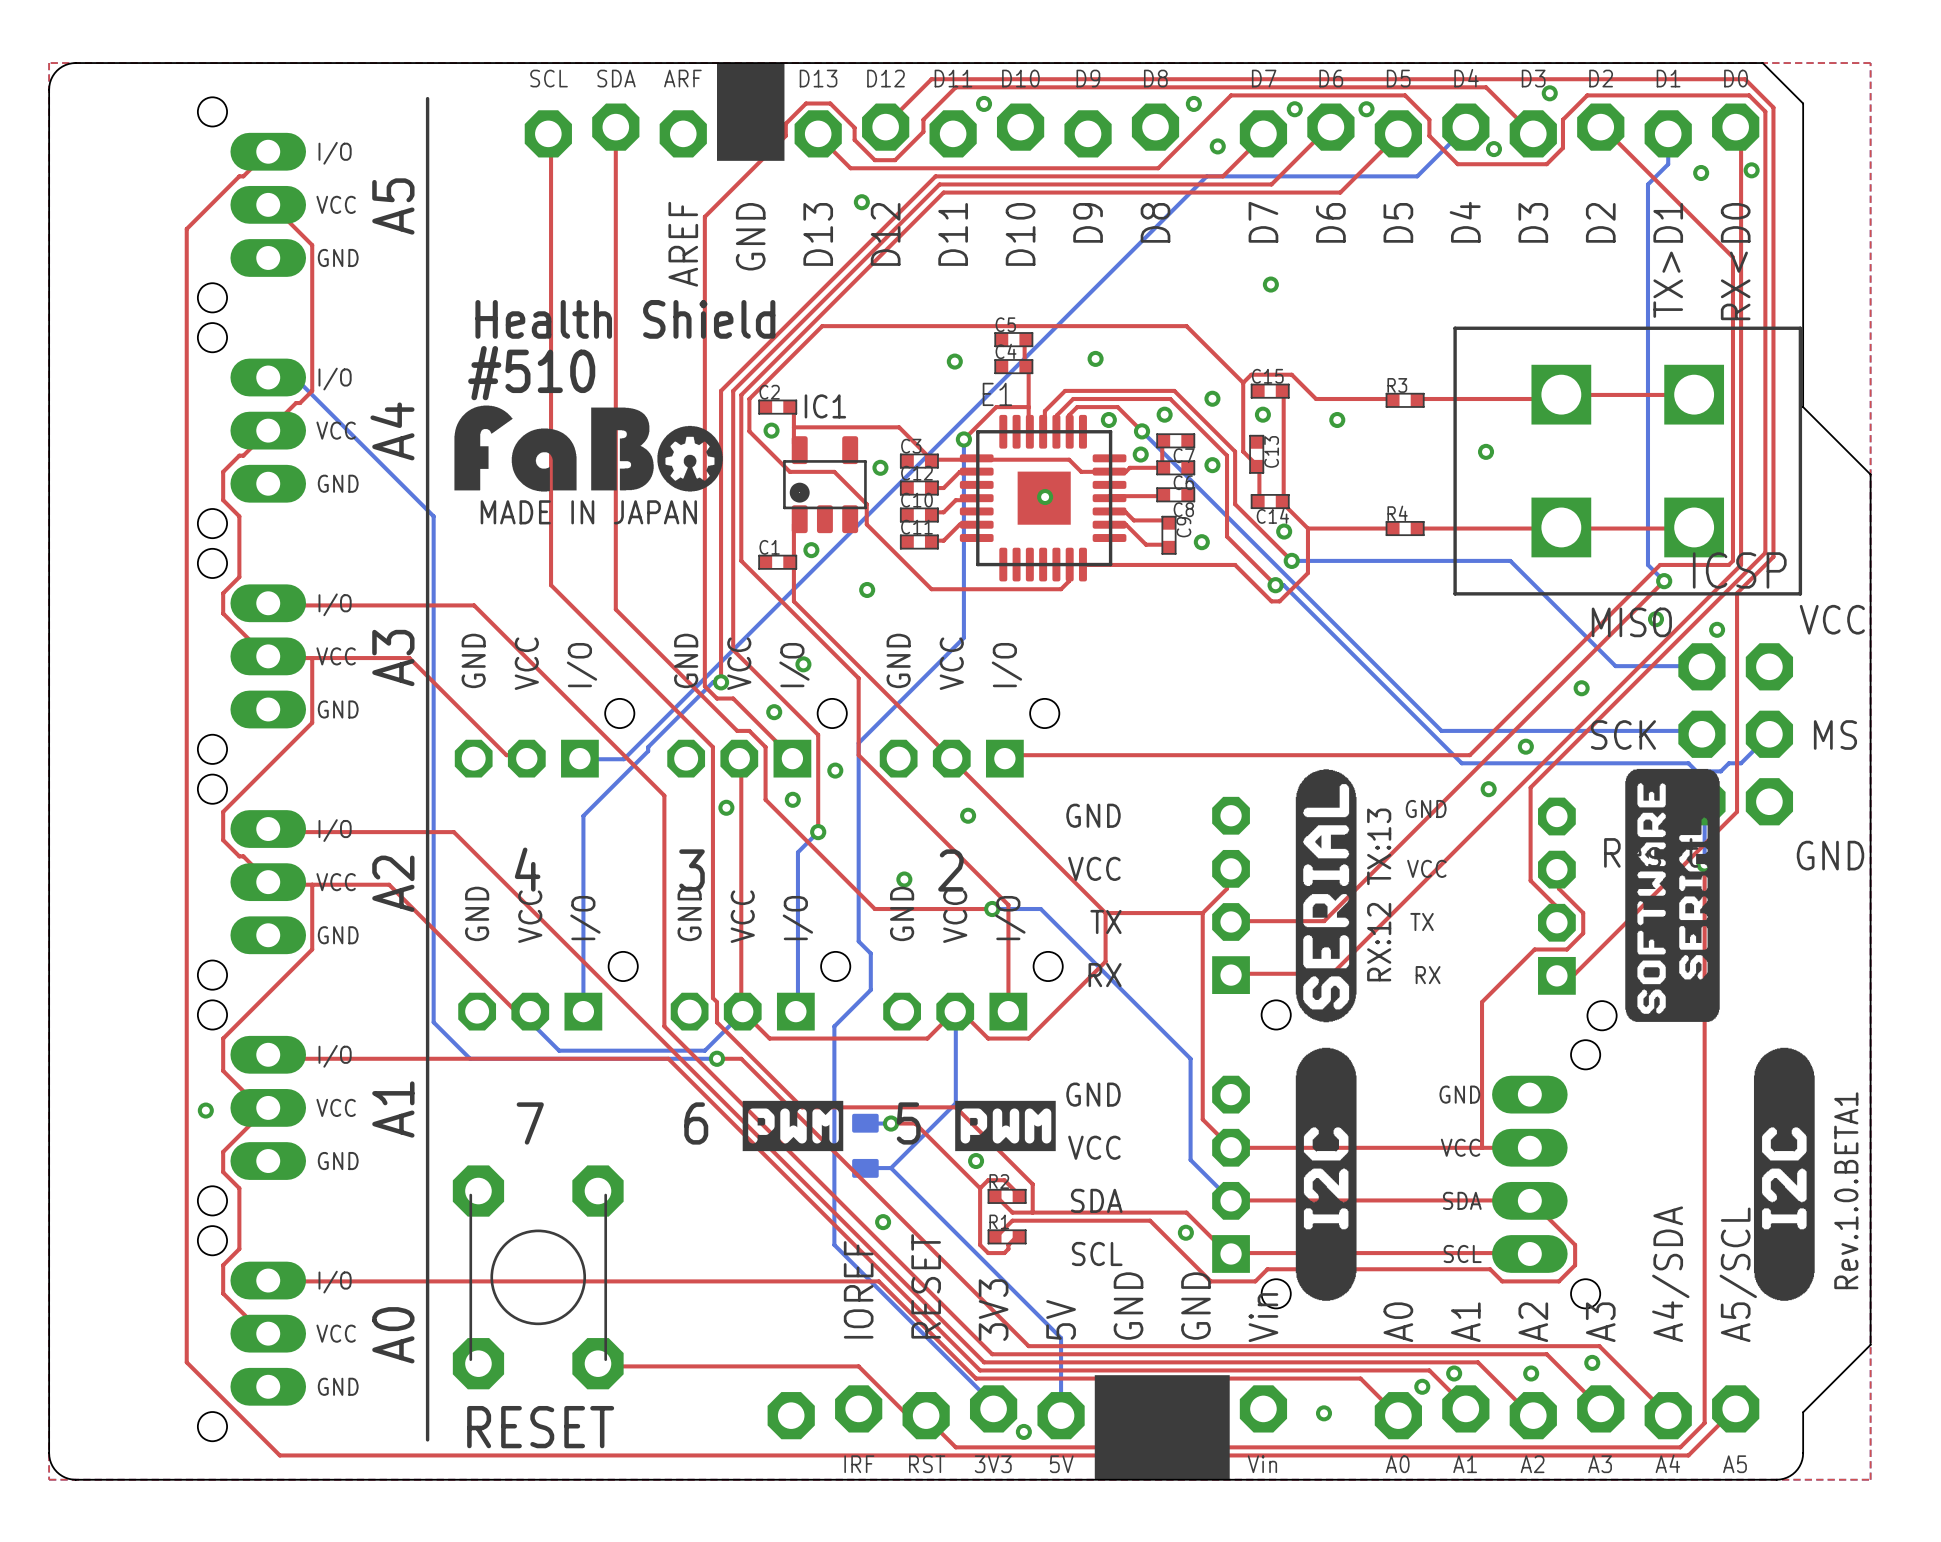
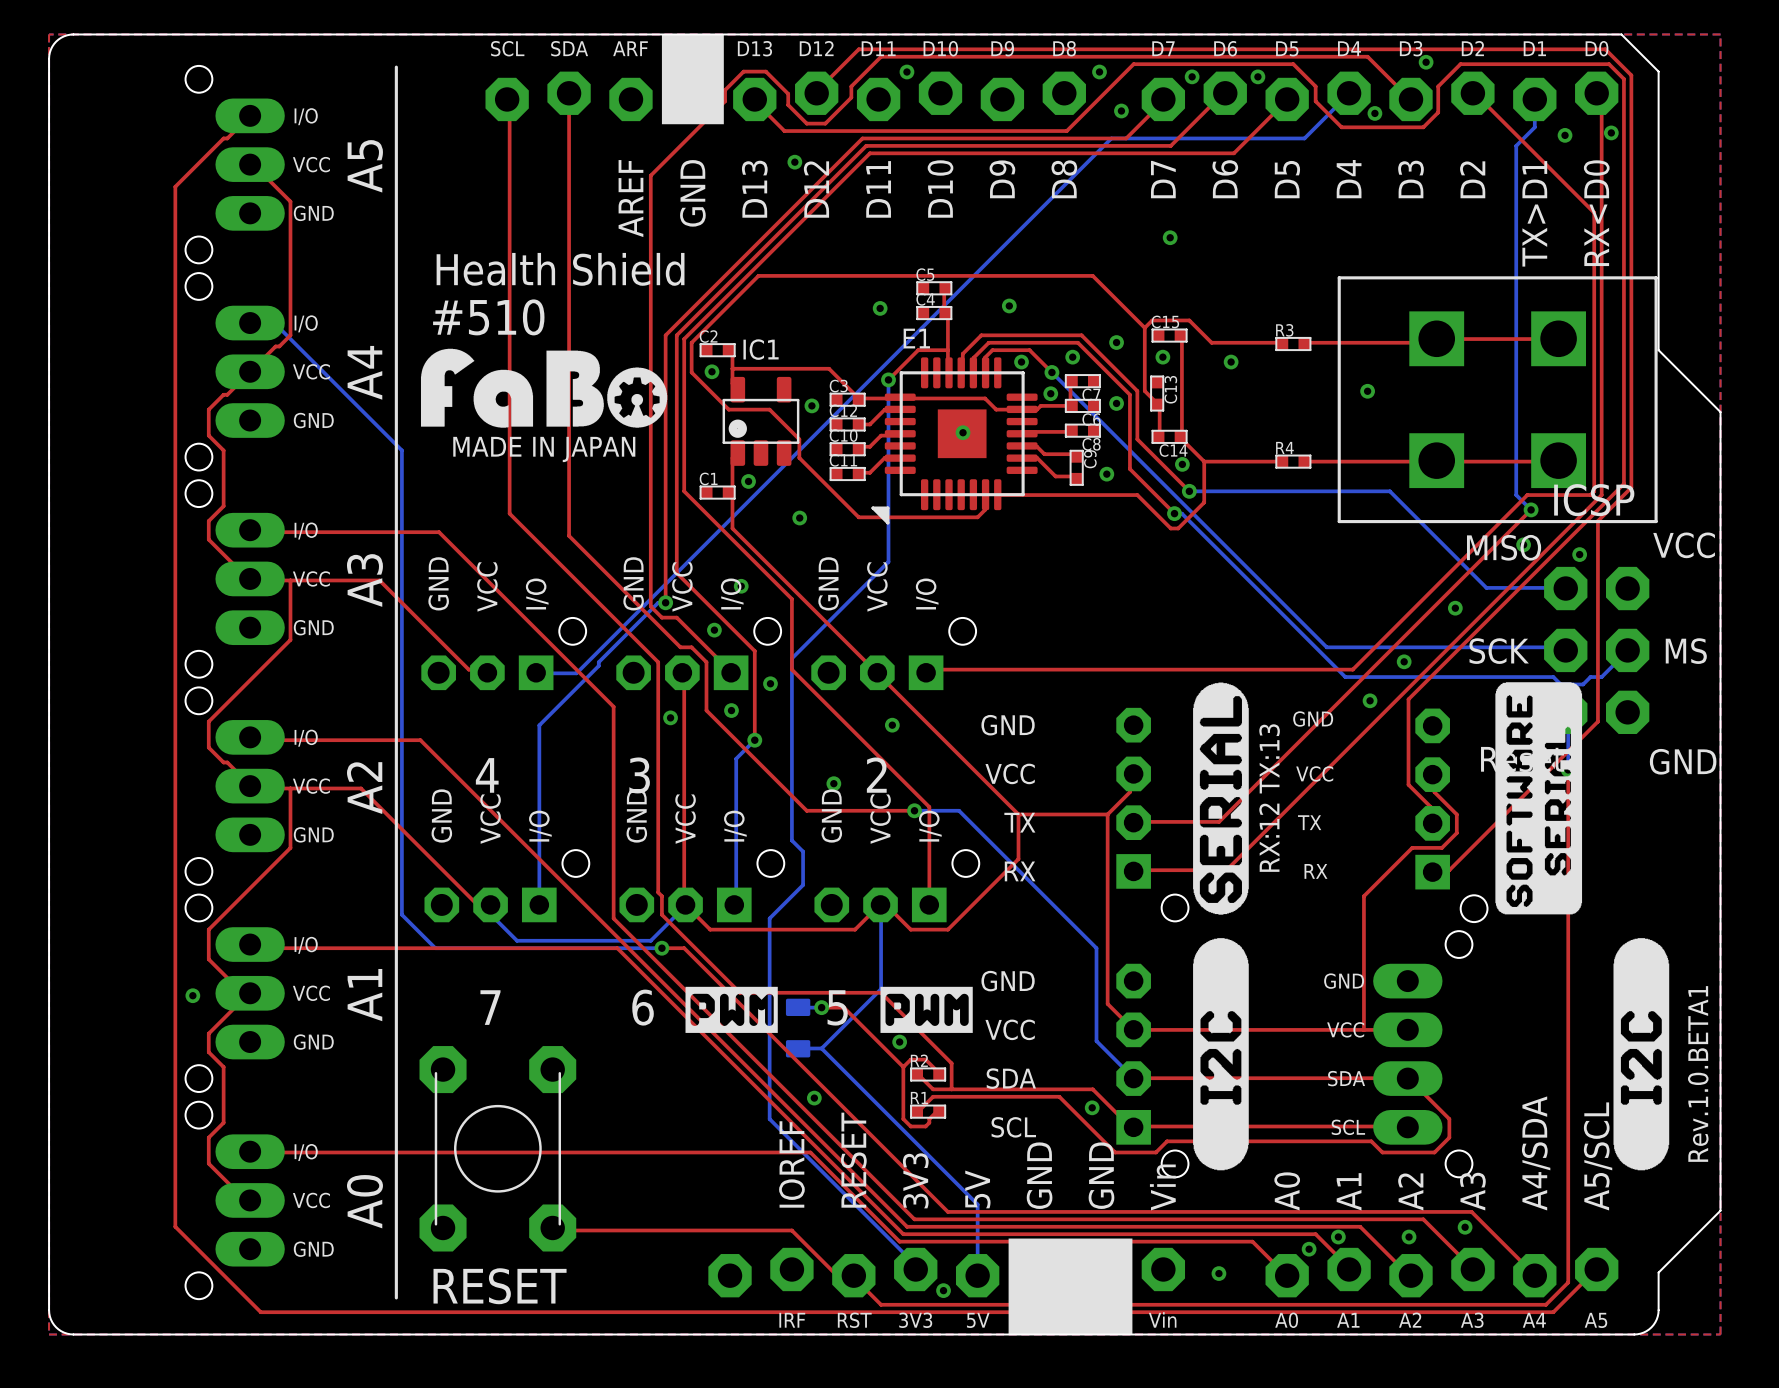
E1 footprint: [959, 414, 1127, 582] -> [871, 357, 1038, 525]

